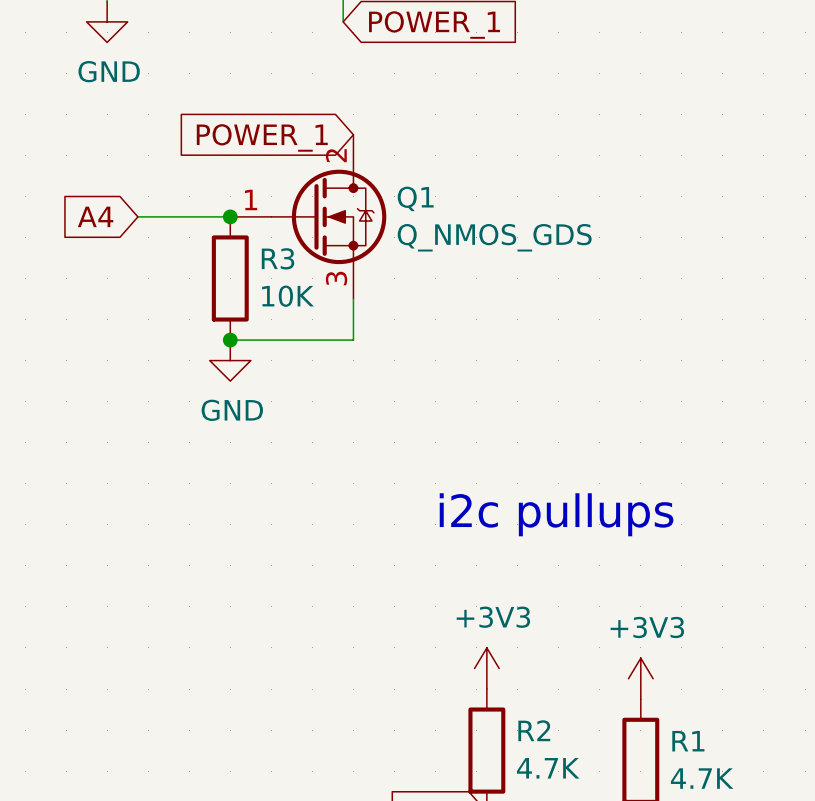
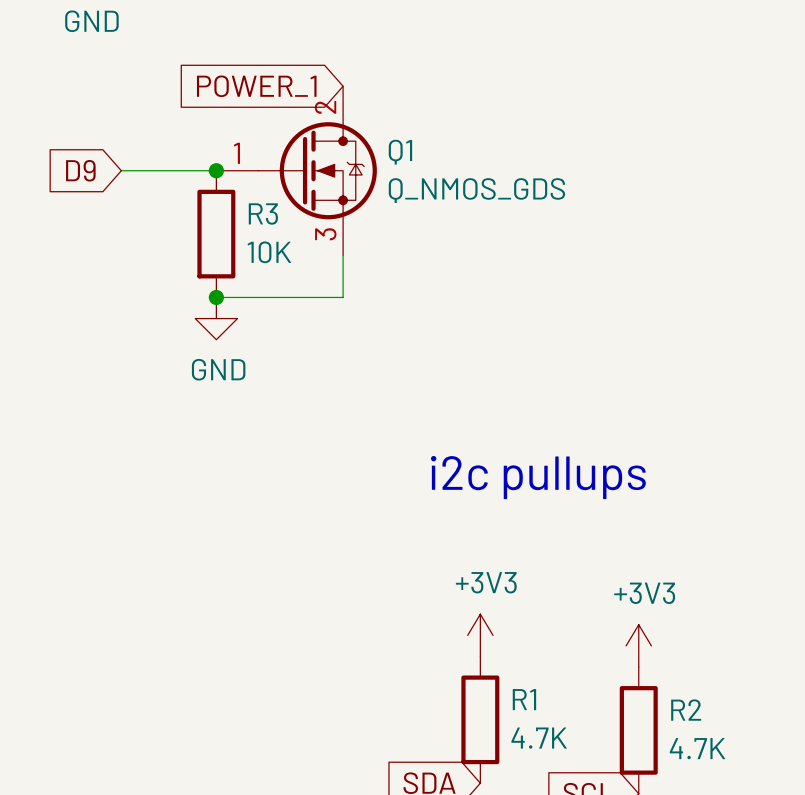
global label: A4 (95, 216) -> D9 (80, 170)
R2 name: R2 (534, 730) -> R1 (524, 699)
R1 name: R1 (688, 741) -> R2 (686, 710)

